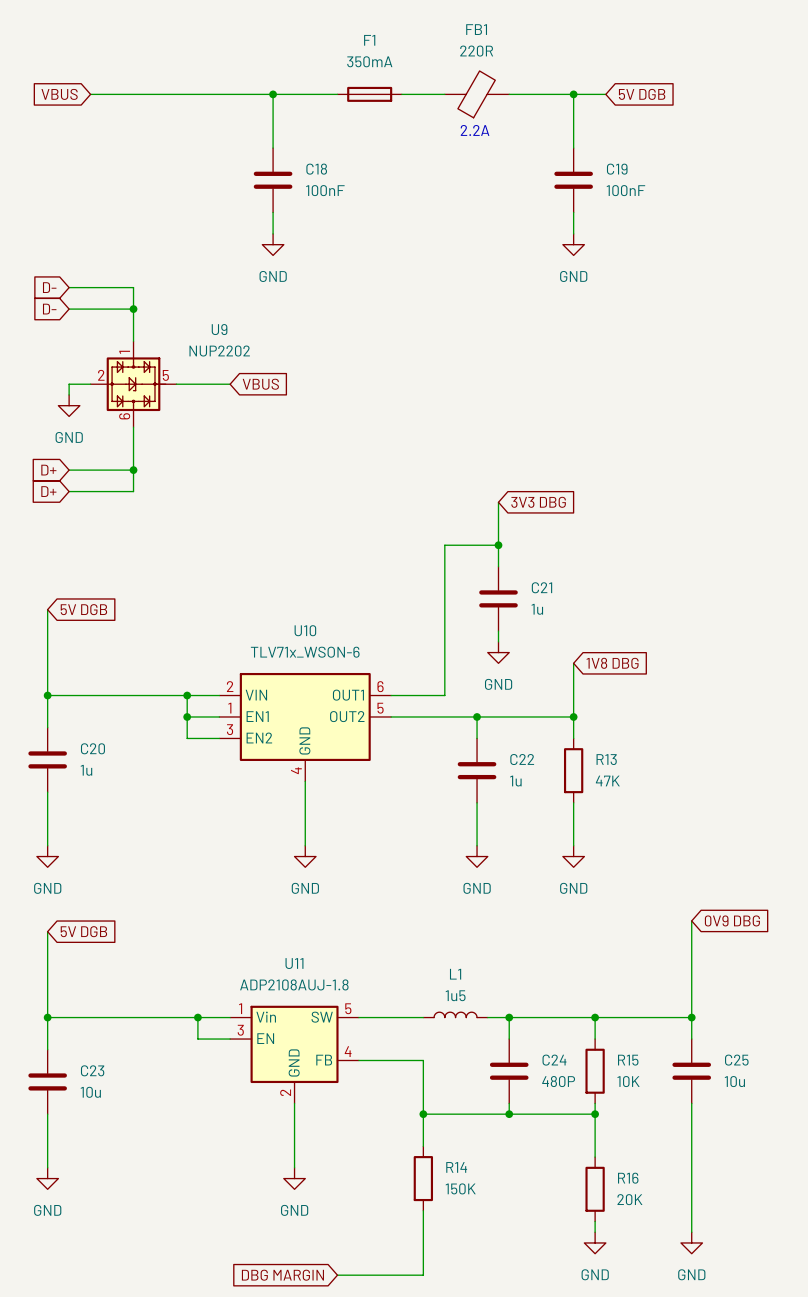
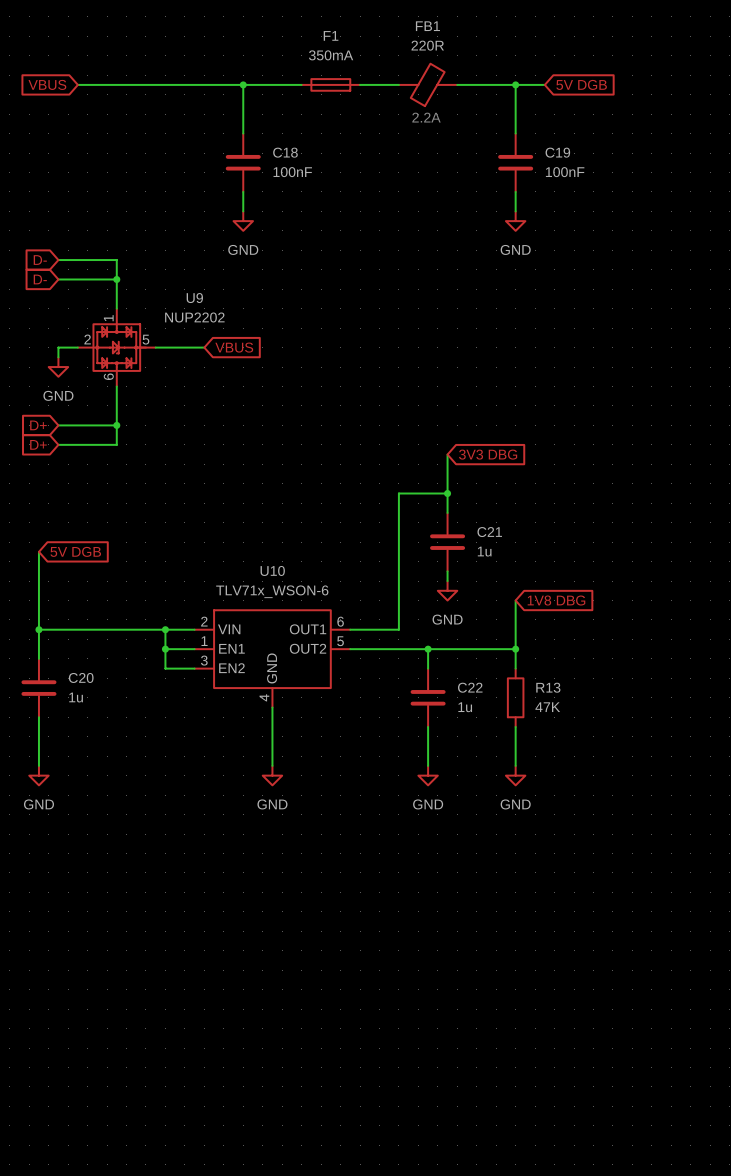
wire: (691, 920) (691, 1039) -> none
global label: 0V9 DBG (732, 920) -> none
wire: (47, 931) (47, 1049) -> none
global label: 5V DGB (83, 931) -> none
L1: 1u5 (455, 1014) -> none
wire: (47, 1017) (230, 1017) -> none
junction: (47, 1017) -> none
wire: (197, 1017) (197, 1039) (230, 1039) -> none
junction: (197, 1017) -> none
wire: (358, 1017) (423, 1017) -> none
wire: (487, 1017) (691, 1017) -> none
wire: (509, 1017) (509, 1039) -> none
junction: (509, 1017) -> none
wire: (595, 1017) (595, 1039) -> none
junction: (595, 1017) -> none
junction: (691, 1017) -> none
U11: ADP2108AUJ-1.8 (294, 1054) -> none
wire: (358, 1060) (423, 1060) (423, 1146) -> none
C24: 480P (509, 1071) -> none
R15: 10K (595, 1071) -> none
C25: 10u (691, 1071) -> none
C23: 10u (47, 1081) -> none
wire: (294, 1103) (294, 1167) -> none
wire: (509, 1103) (509, 1114) -> none
wire: (595, 1103) (595, 1157) -> none
wire: (691, 1103) (691, 1232) -> none
wire: (47, 1114) (47, 1167) -> none
wire: (423, 1114) (595, 1114) -> none
junction: (423, 1114) -> none
junction: (509, 1114) -> none
junction: (595, 1114) -> none
power symbol: GND (47, 1178) -> none
power symbol: GND (294, 1178) -> none
R14: 150K (423, 1178) -> none
R16: 20K (595, 1189) -> none
wire: (423, 1210) (423, 1275) (337, 1275) -> none
wire: (595, 1221) (595, 1232) -> none
power symbol: GND (595, 1242) -> none
power symbol: GND (691, 1242) -> none
global label: DBG MARGIN (282, 1275) -> none

